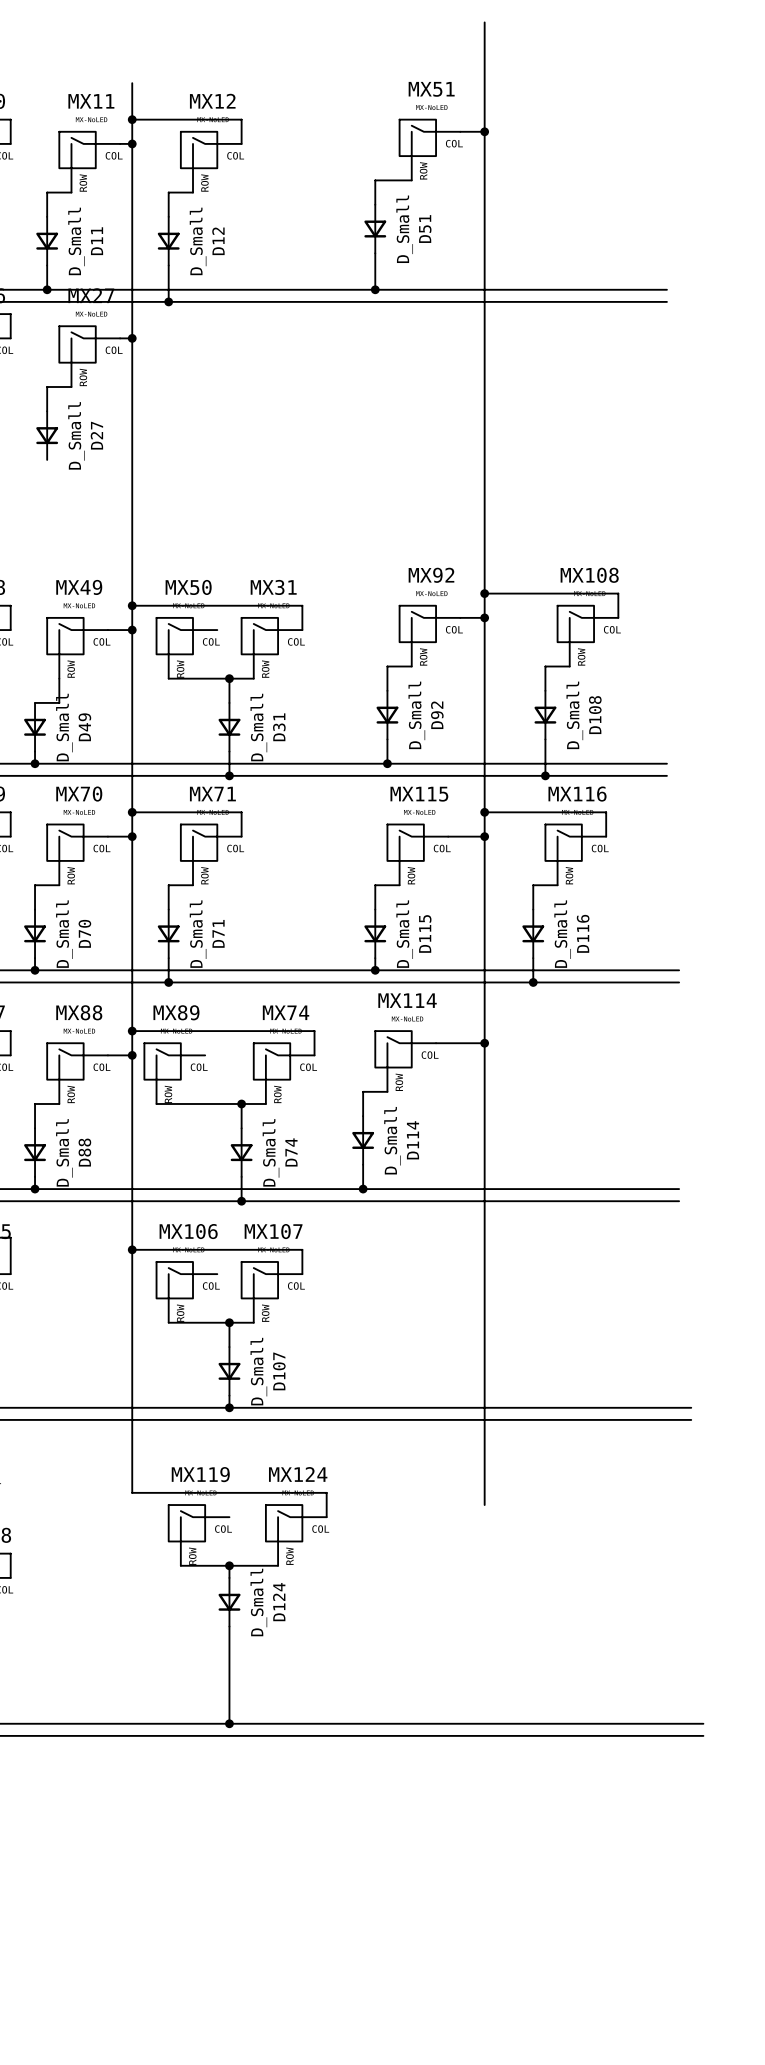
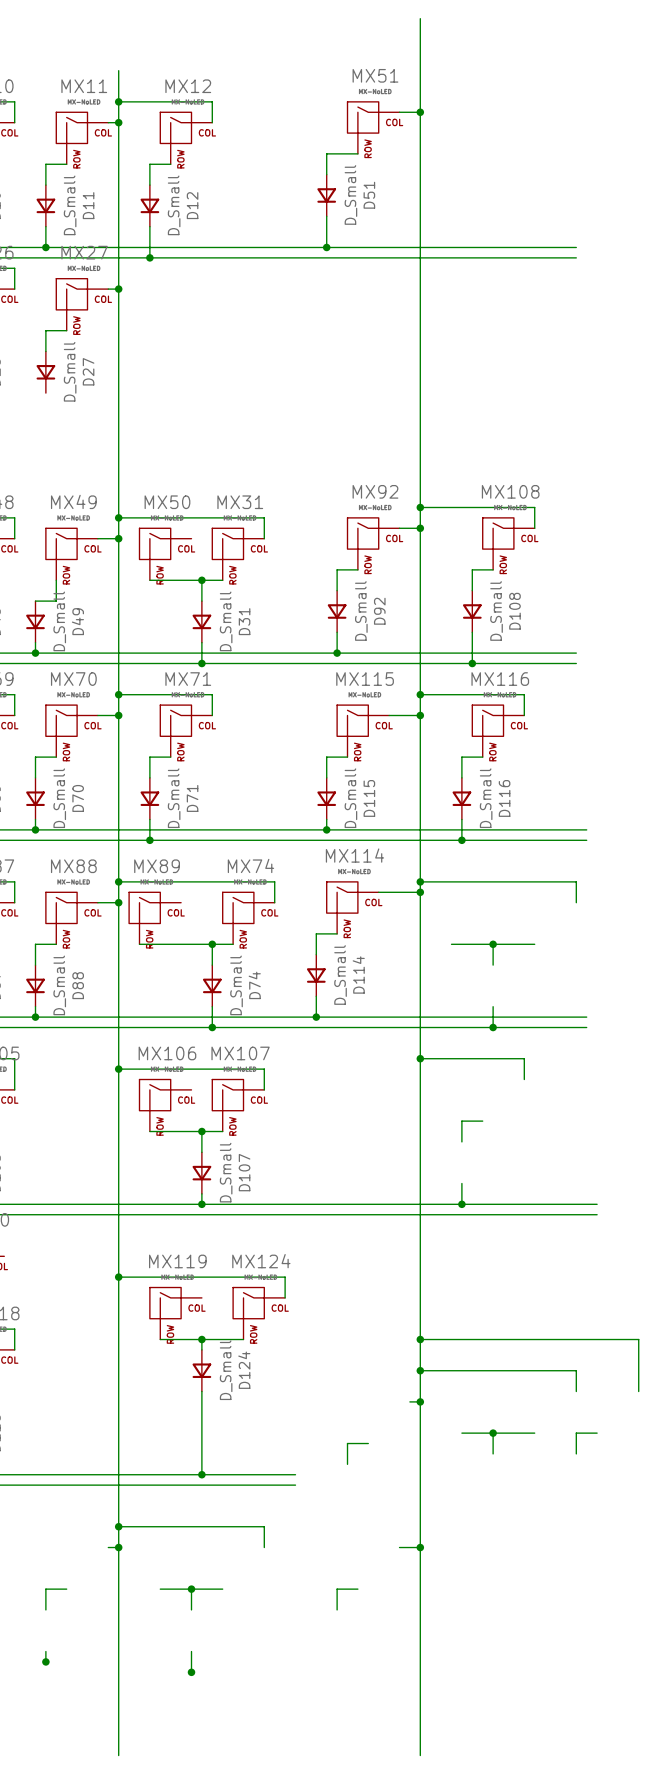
wire: none -> (420, 881) (576, 881) (576, 902)
junction: none -> (420, 881)
wire: none -> (451, 944) (534, 944)
wire: none -> (493, 944) (493, 965)
junction: none -> (493, 944)
wire: none -> (493, 1006) (493, 1027)
junction: none -> (493, 1027)
wire: none -> (420, 1058) (524, 1058) (524, 1079)
junction: none -> (420, 1058)
wire: none -> (482, 1121) (461, 1121) (461, 1141)
wire: none -> (461, 1183) (461, 1204)
junction: none -> (461, 1204)
wire: none -> (118, 1277) (118, 1755)
junction: none -> (118, 1277)
wire: none -> (420, 1287) (420, 1755)
wire: none -> (420, 1339) (638, 1339) (638, 1391)
junction: none -> (420, 1339)
wire: none -> (420, 1370) (576, 1370) (576, 1391)
junction: none -> (420, 1370)
wire: none -> (409, 1401) (420, 1401)
junction: none -> (420, 1401)
wire: none -> (461, 1433) (534, 1433)
wire: none -> (493, 1433) (493, 1453)
junction: none -> (493, 1433)
wire: none -> (597, 1433) (576, 1433) (576, 1453)
wire: none -> (368, 1443) (347, 1443) (347, 1464)
wire: (338, 1723) (703, 1723) -> none
wire: (338, 1735) (703, 1735) -> none
wire: none -> (118, 1526) (264, 1526) (264, 1547)
junction: none -> (118, 1526)
wire: none -> (108, 1547) (118, 1547)
junction: none -> (118, 1547)
wire: none -> (399, 1547) (420, 1547)
junction: none -> (420, 1547)
wire: none -> (66, 1589) (45, 1589) (45, 1609)
wire: none -> (160, 1589) (222, 1589)
wire: none -> (191, 1589) (191, 1609)
junction: none -> (191, 1589)
wire: none -> (357, 1589) (337, 1589) (337, 1609)
wire: none -> (45, 1651) (45, 1661)
wire: none -> (191, 1651) (191, 1672)
junction: none -> (45, 1661)
junction: none -> (191, 1672)

